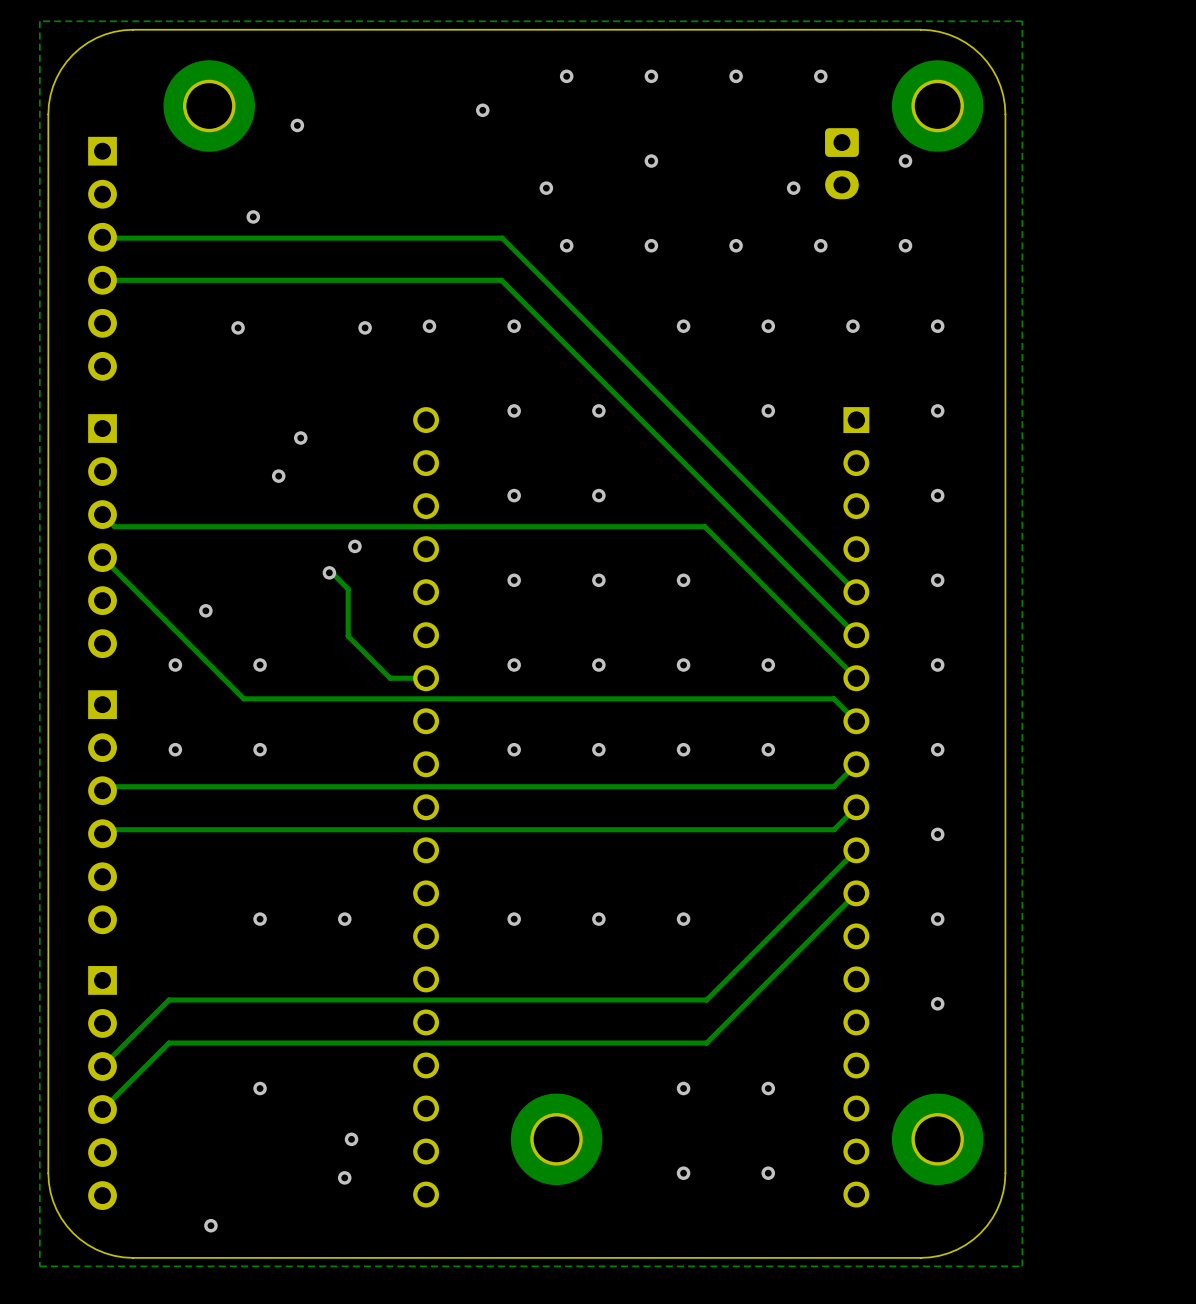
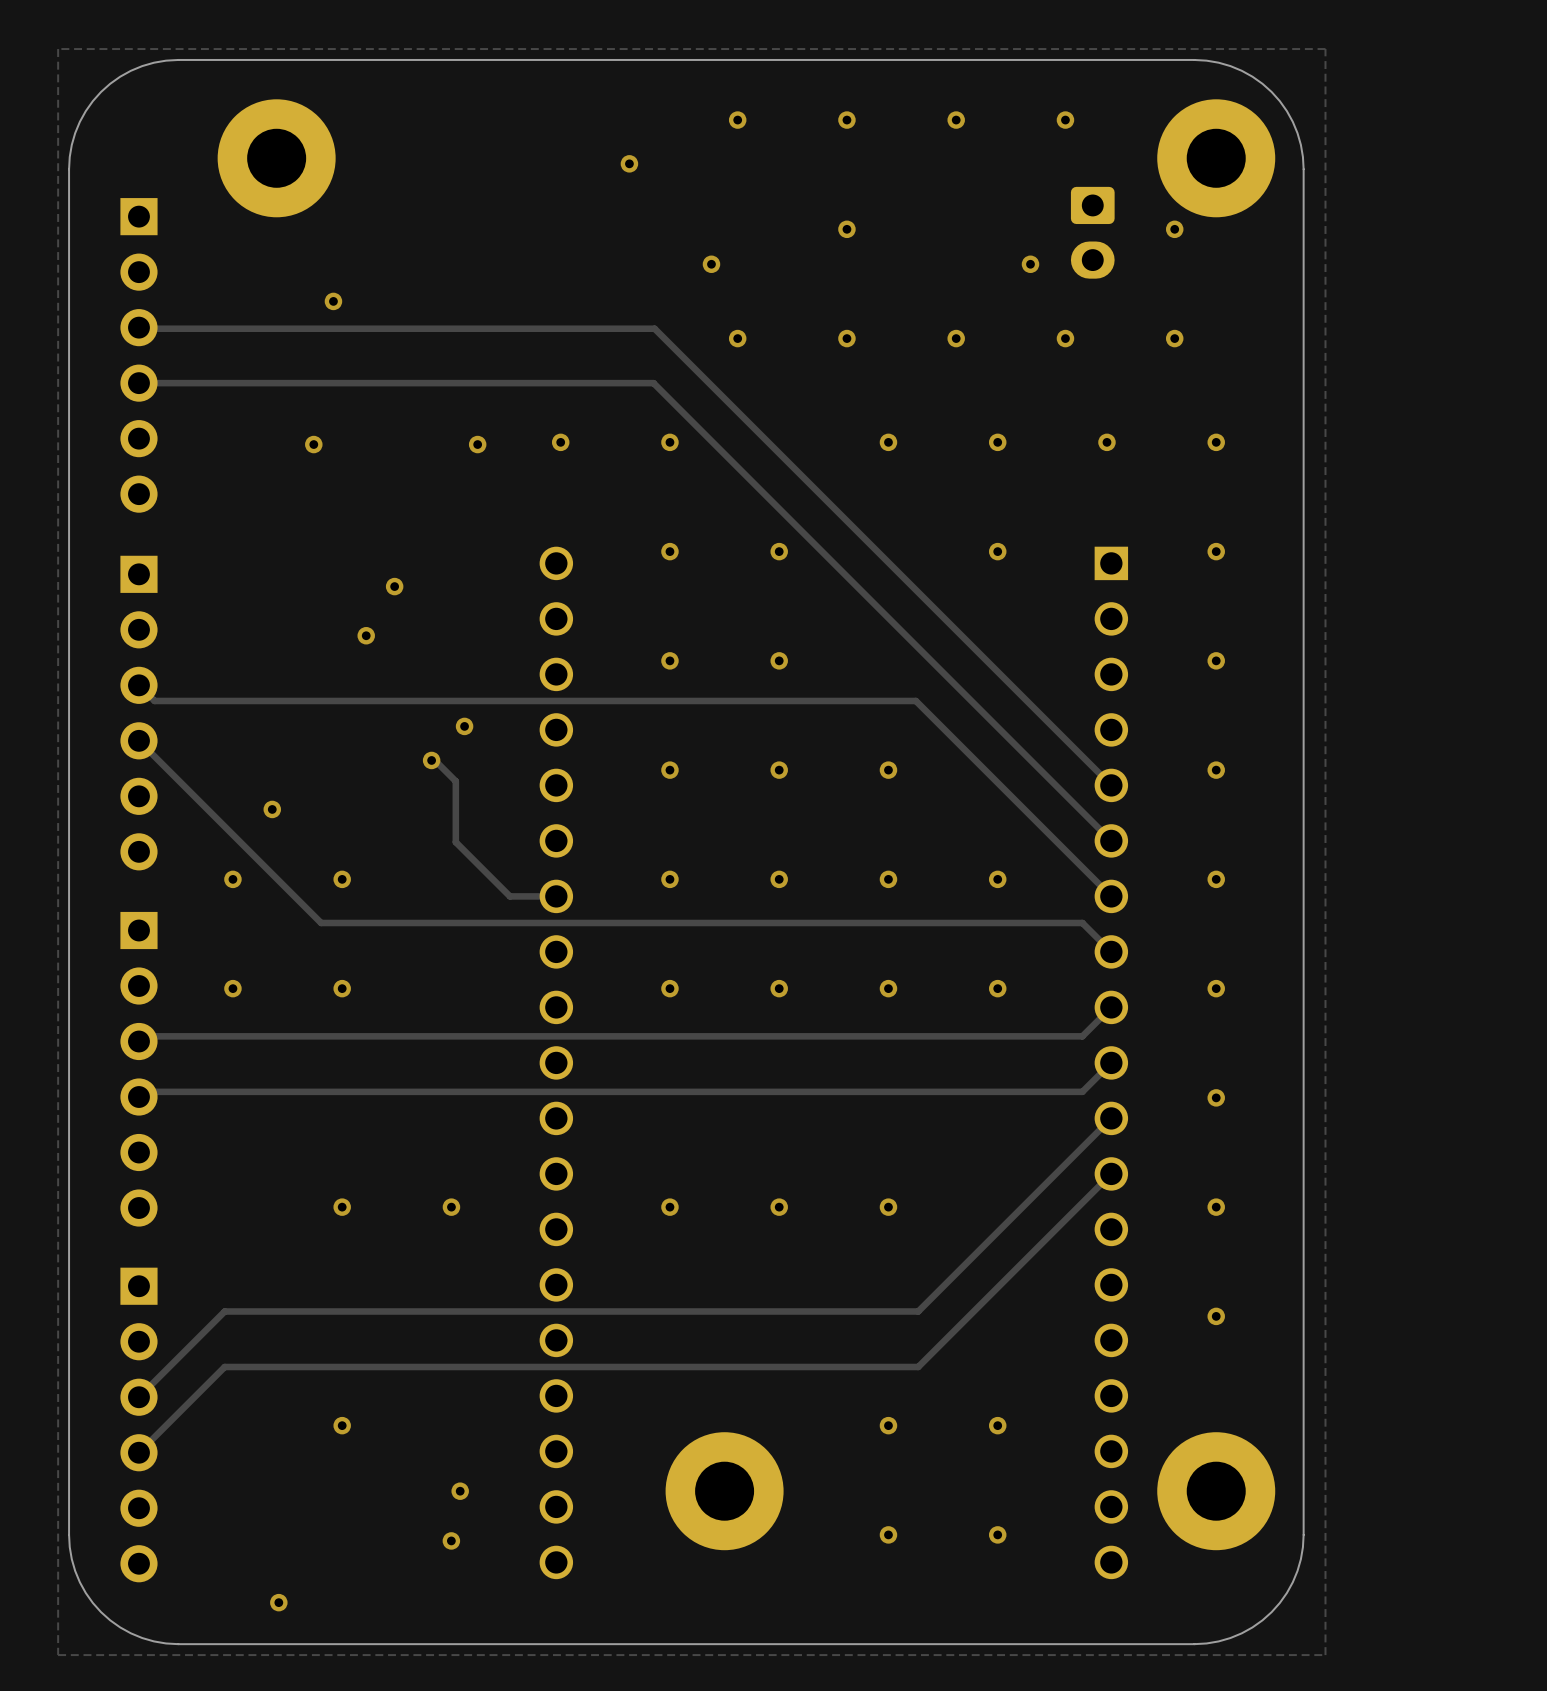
via: (297, 125) -> none

